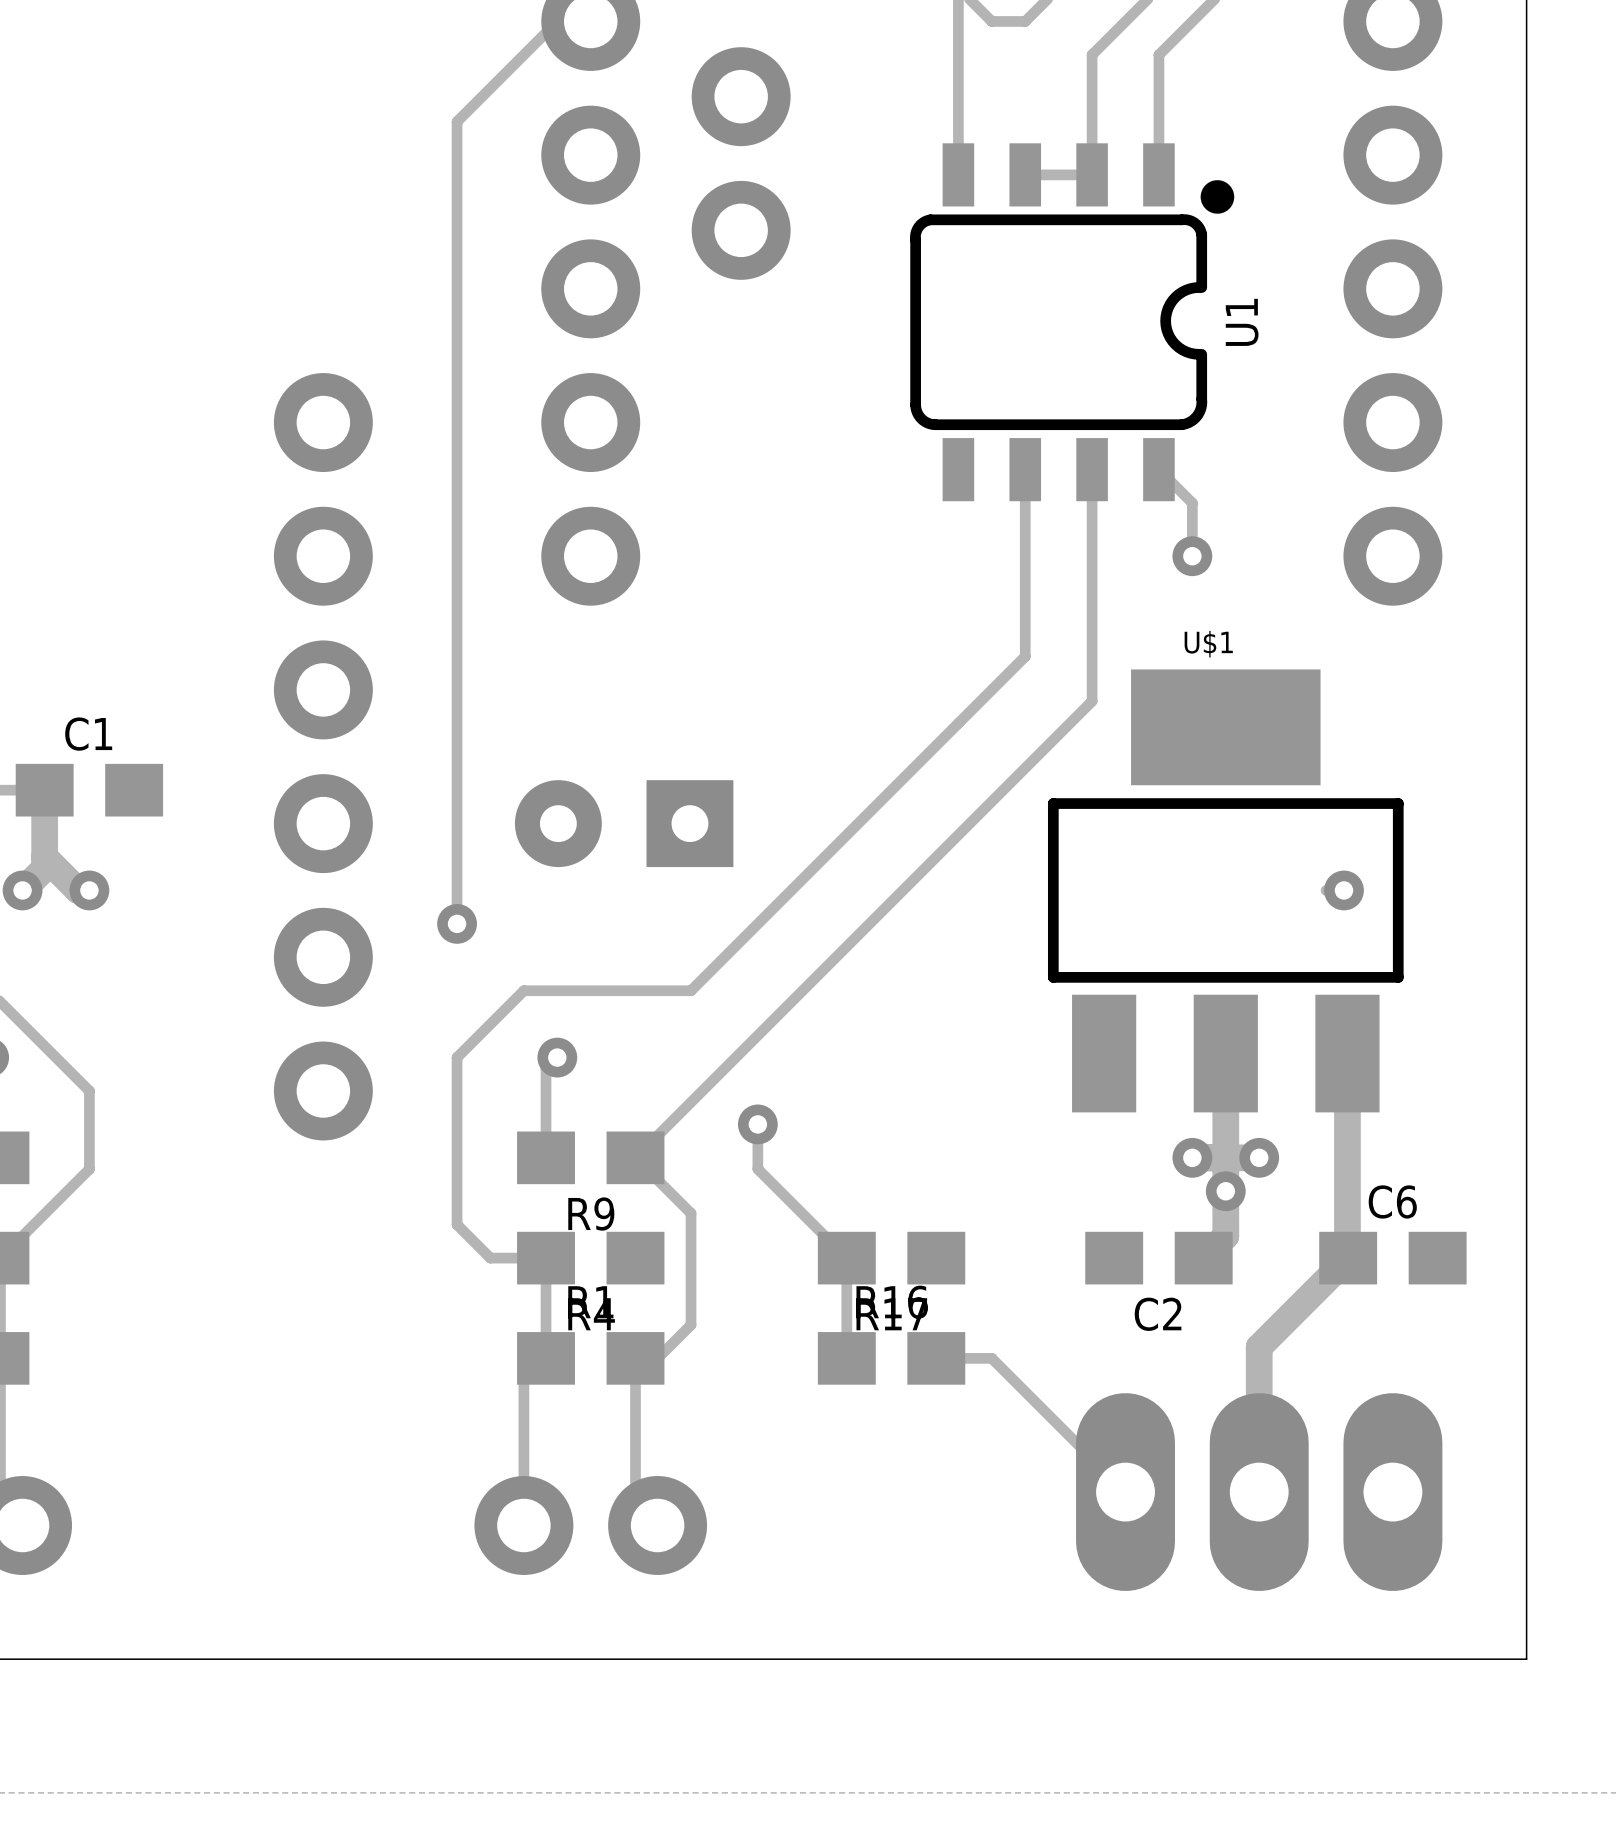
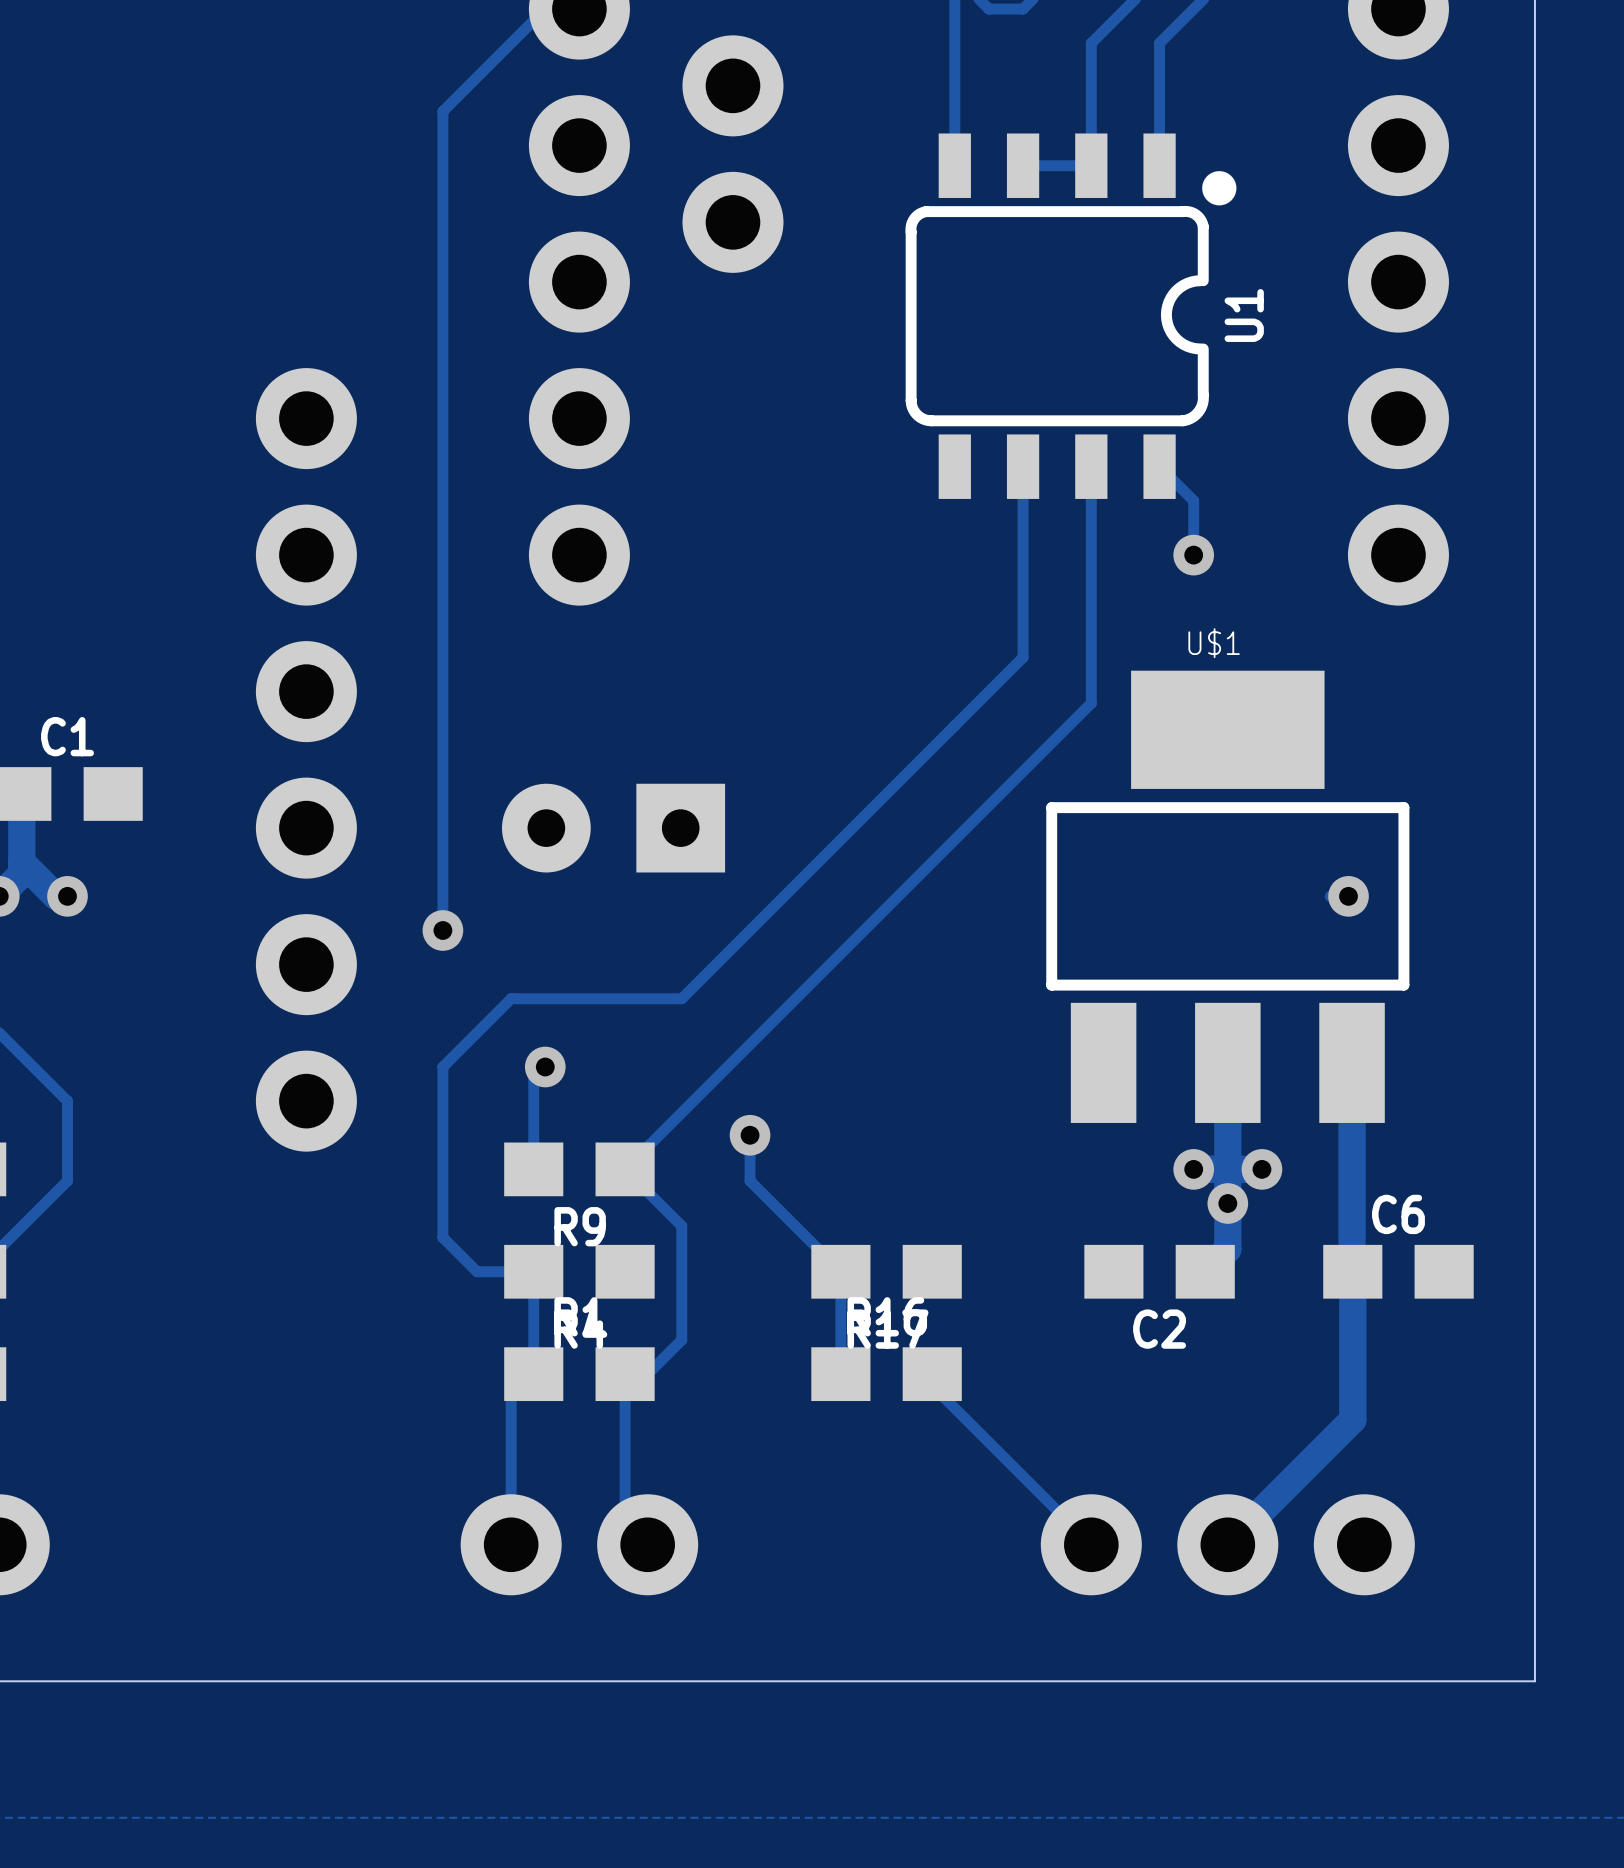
track: (1348, 1258) (1259, 1347) (1259, 1492) -> (1352, 1271) (1352, 1419) (1227, 1544)
track: (936, 1358) (991, 1358) (1125, 1492) -> (932, 1374) (932, 1385) (1091, 1544)
part footprint: [1076, 1393, 1443, 1592] -> [1040, 1494, 1415, 1596]

